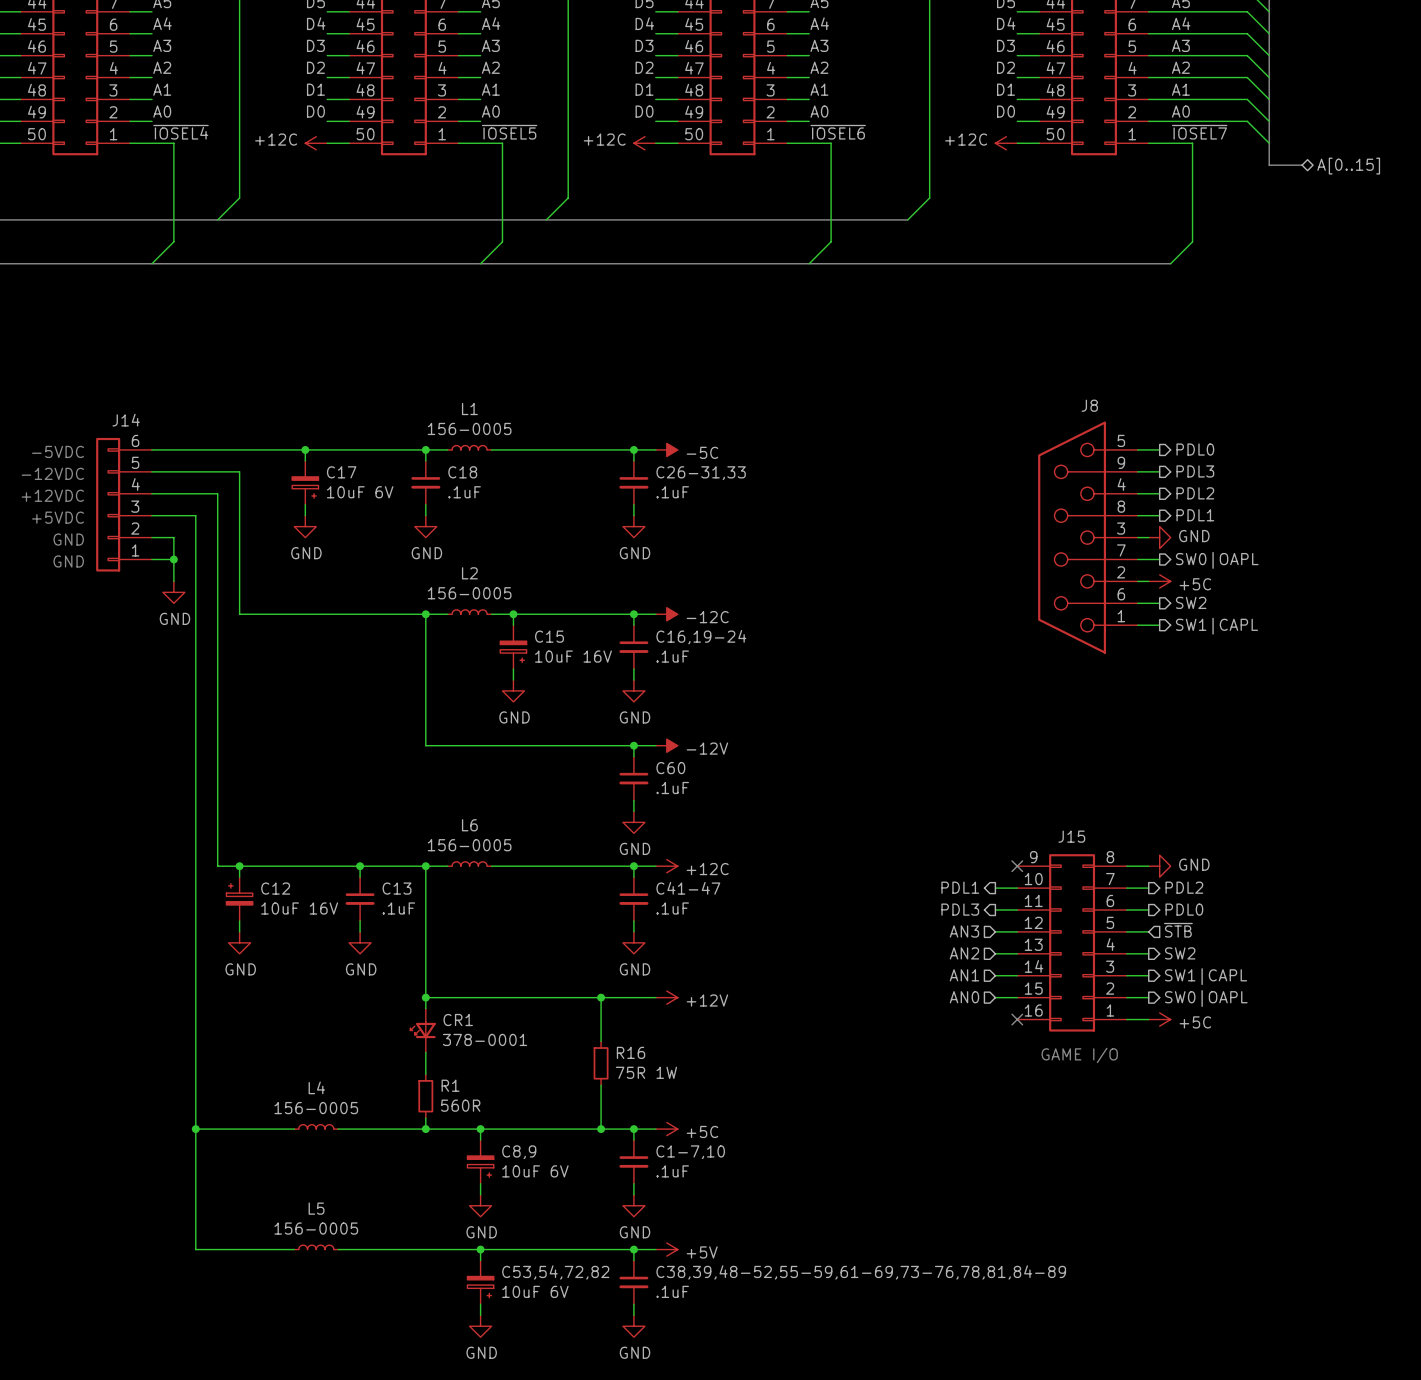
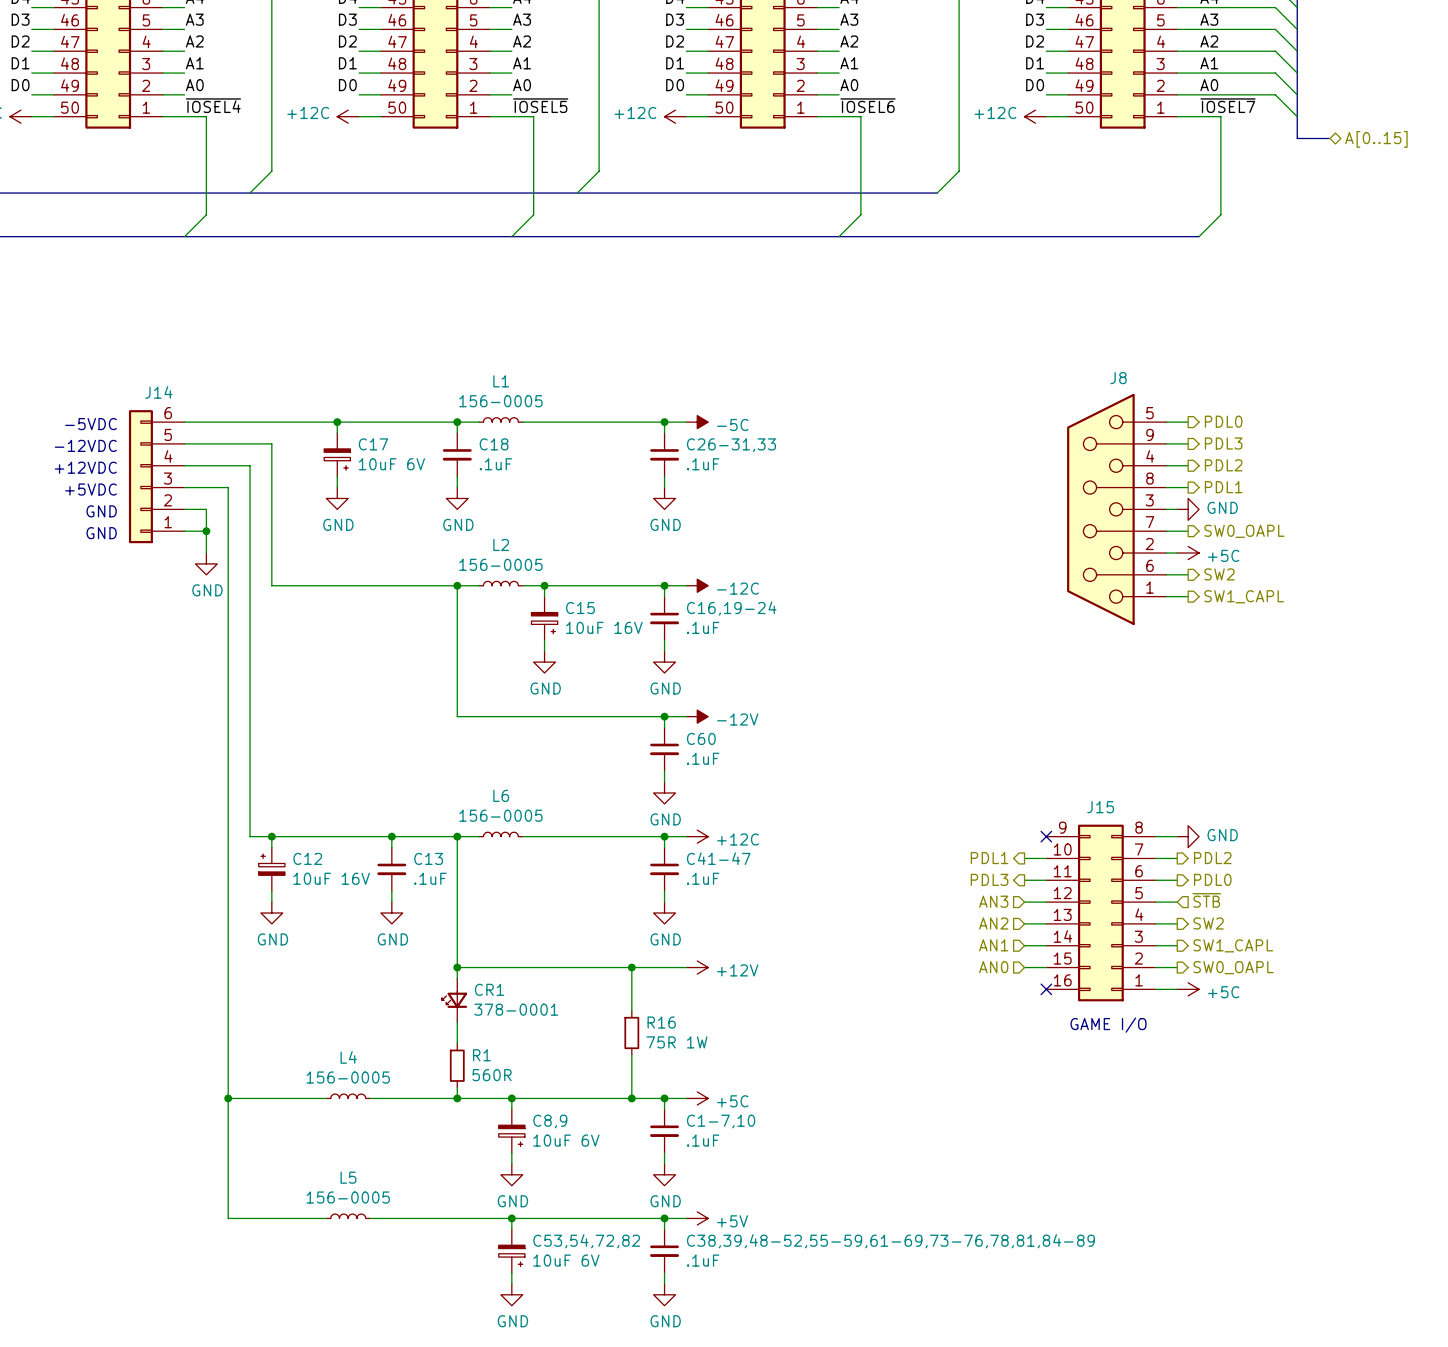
hierarchical label: SW0|OAPL (1217, 560) -> SW0_OAPL (1244, 531)
hierarchical label: SW1|CAPL (1216, 626) -> SW1_CAPL (1244, 596)
hierarchical label: SW1|CAPL (1206, 976) -> SW1_CAPL (1233, 945)
hierarchical label: SW0|OAPL (1206, 998) -> SW0_OAPL (1233, 967)

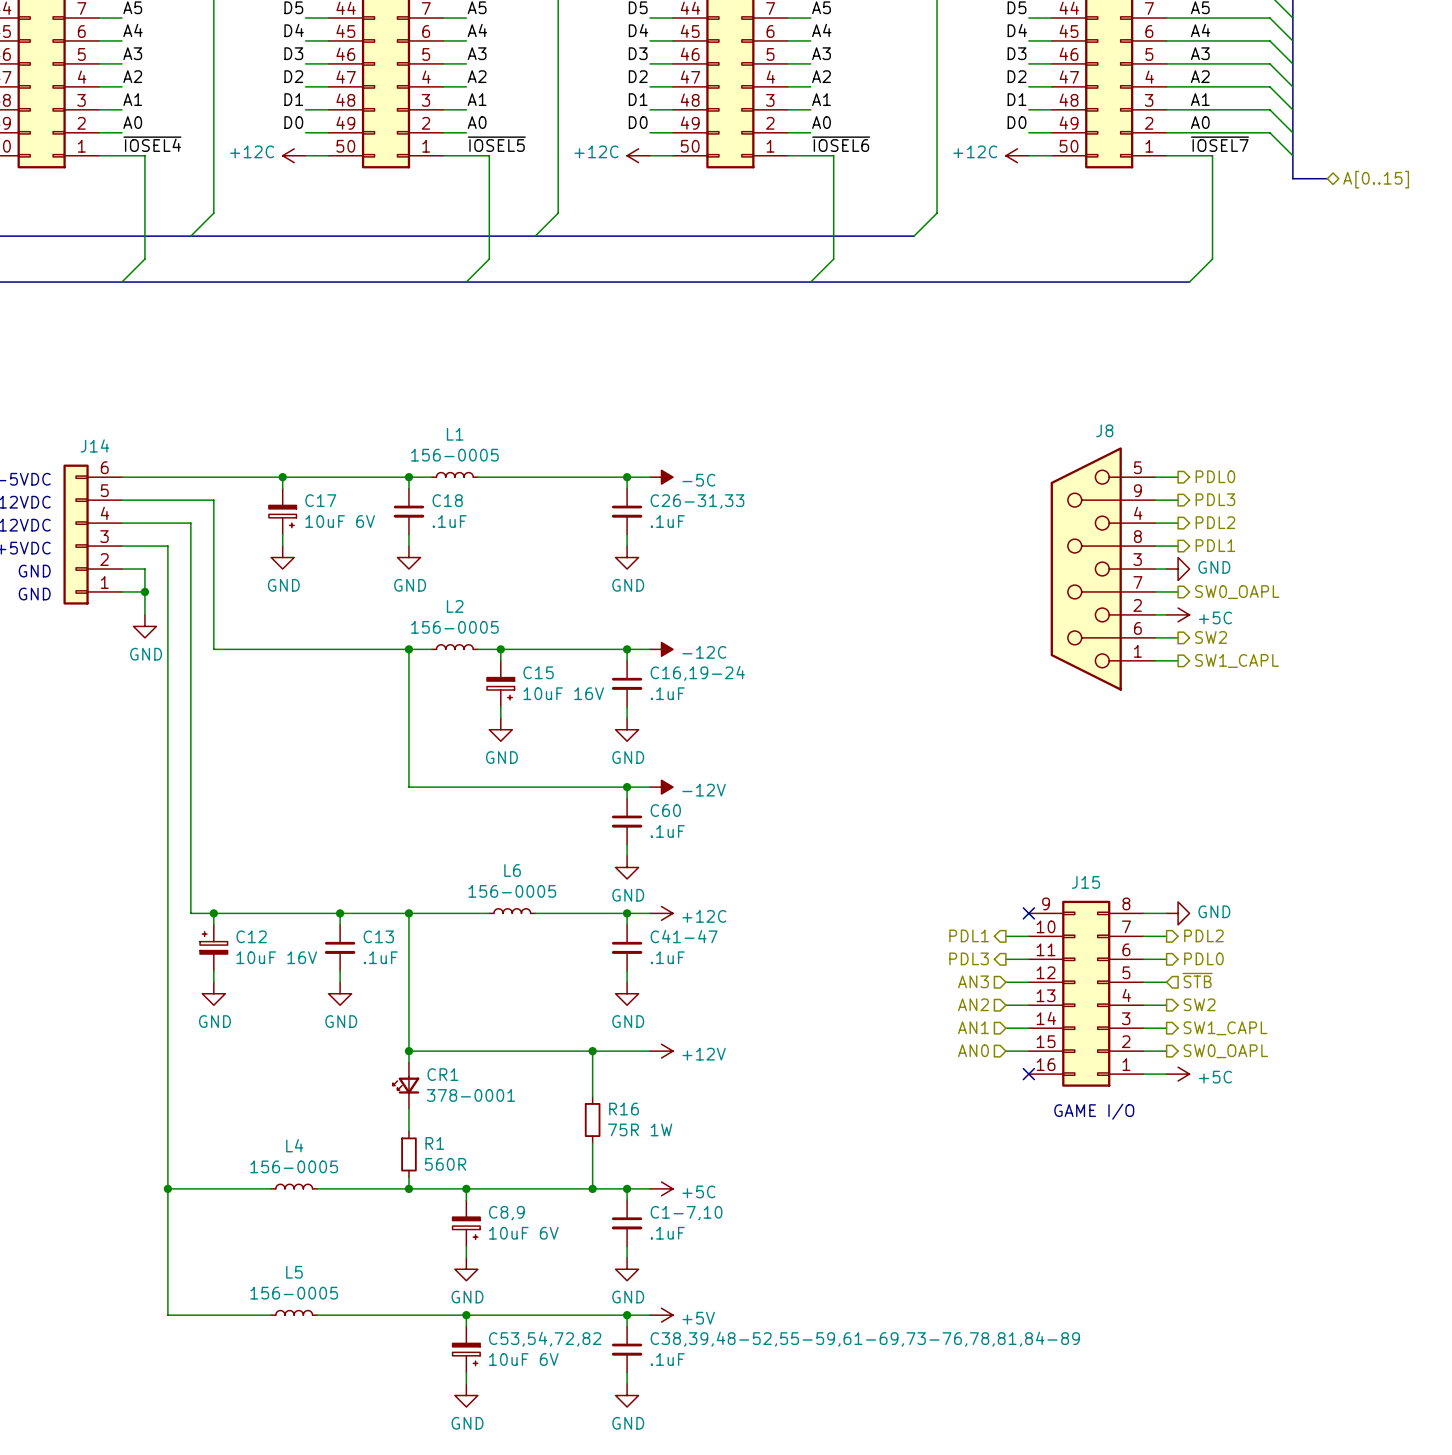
L6 position: (500, 834) -> (512, 911)
wire: (533, 836) (577, 836) -> (431, 913) (477, 913)

